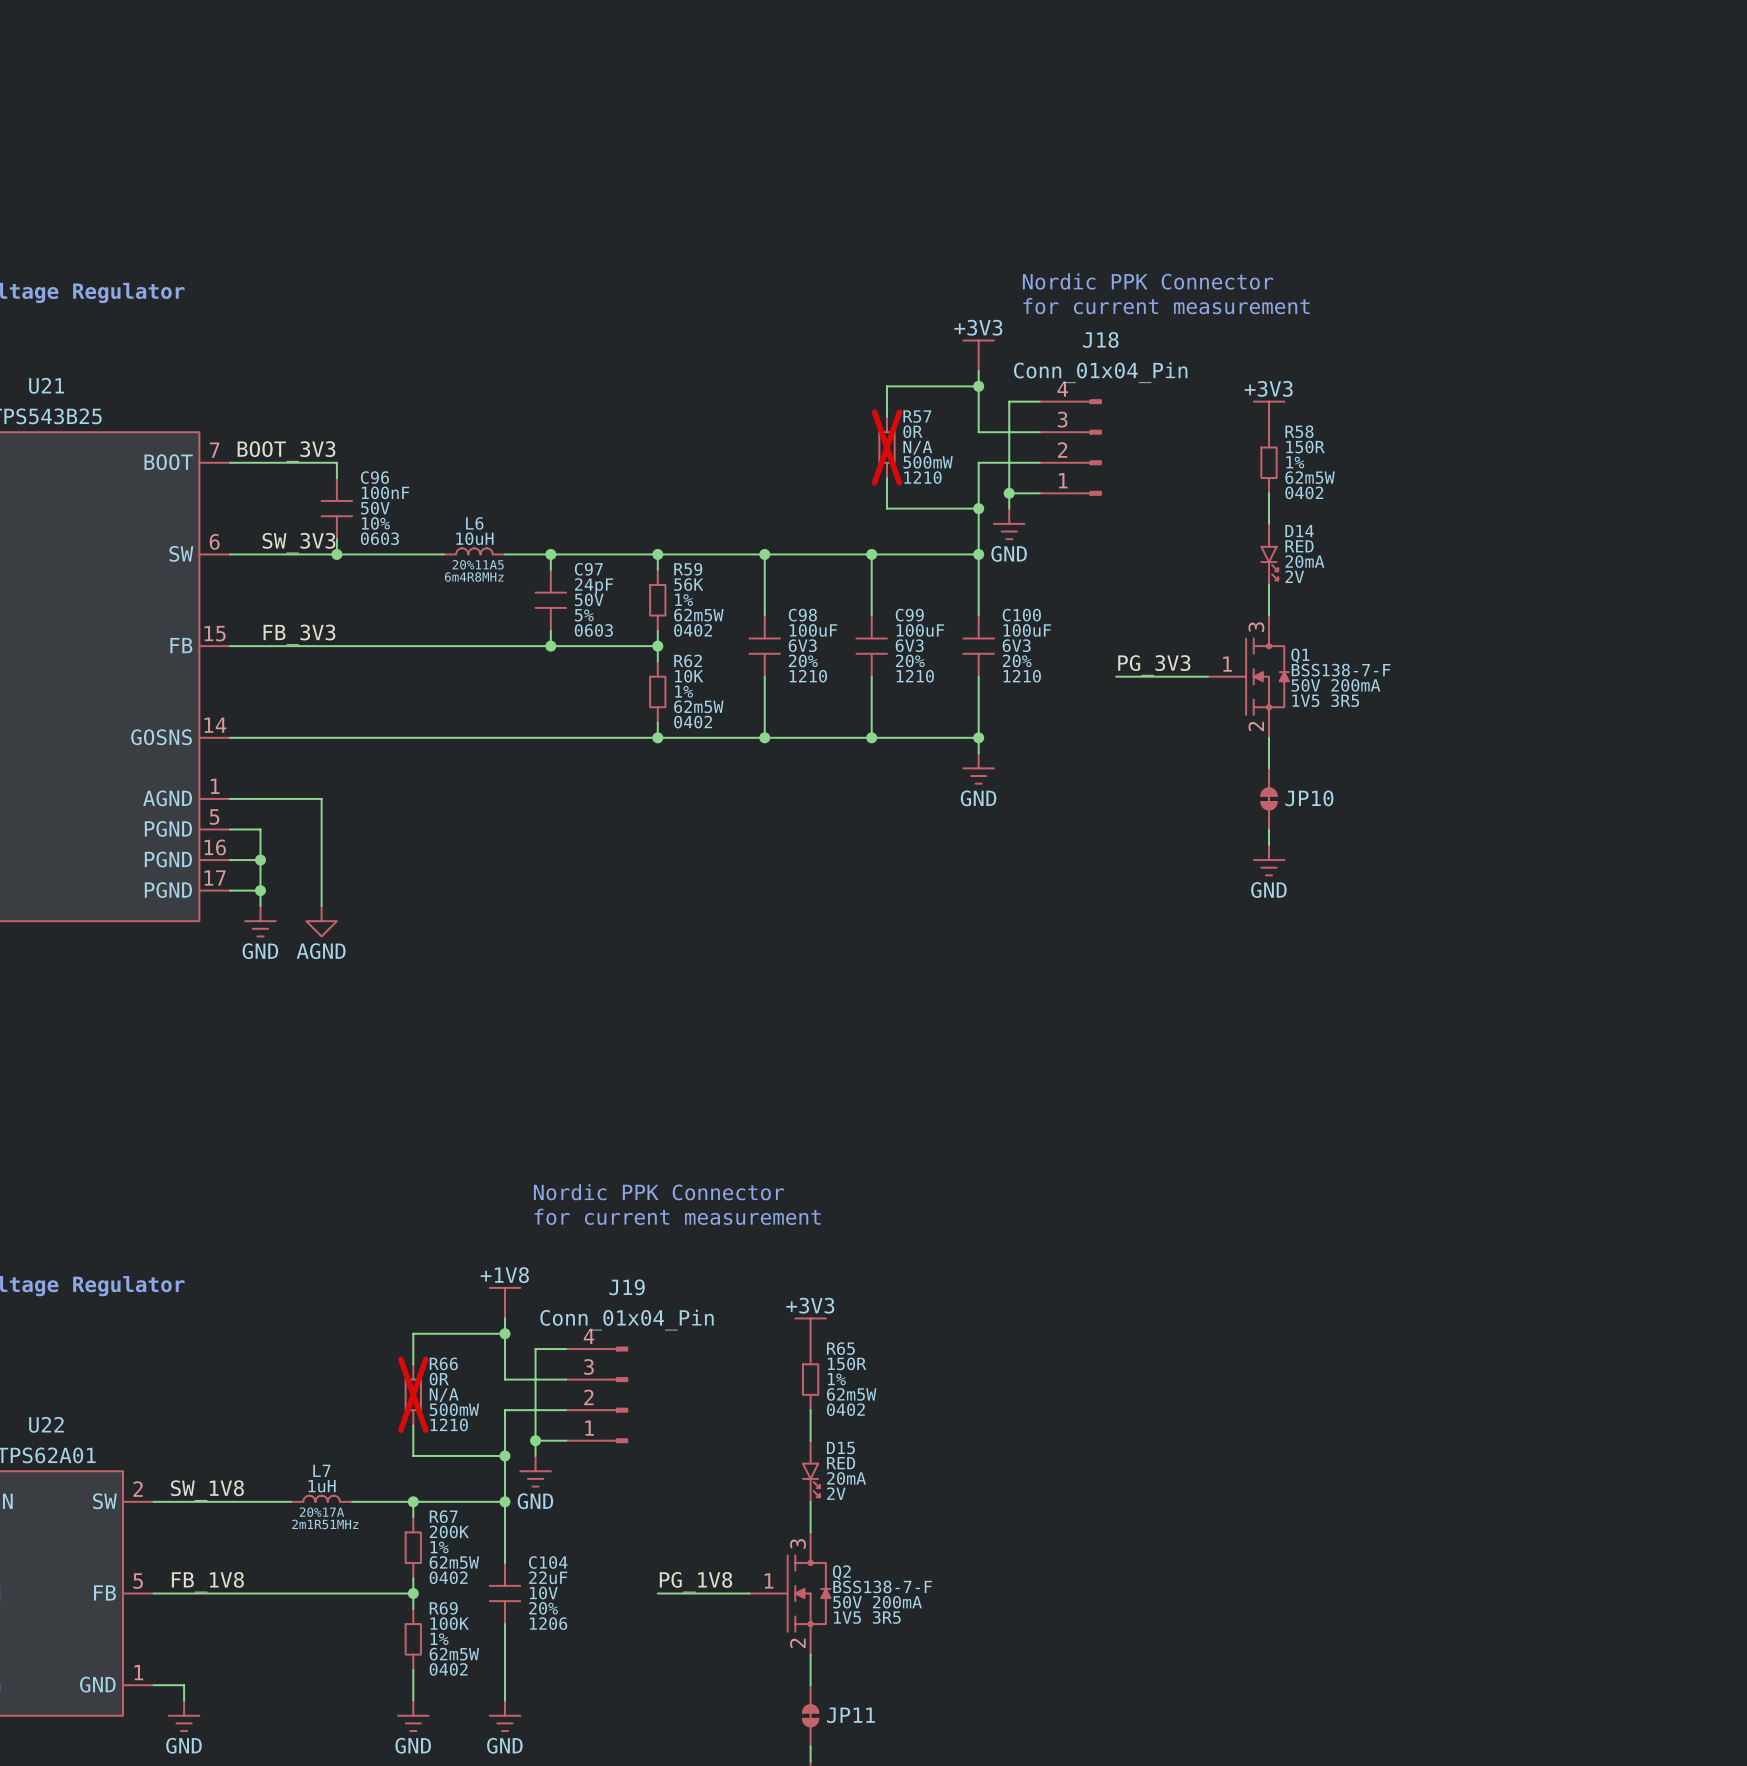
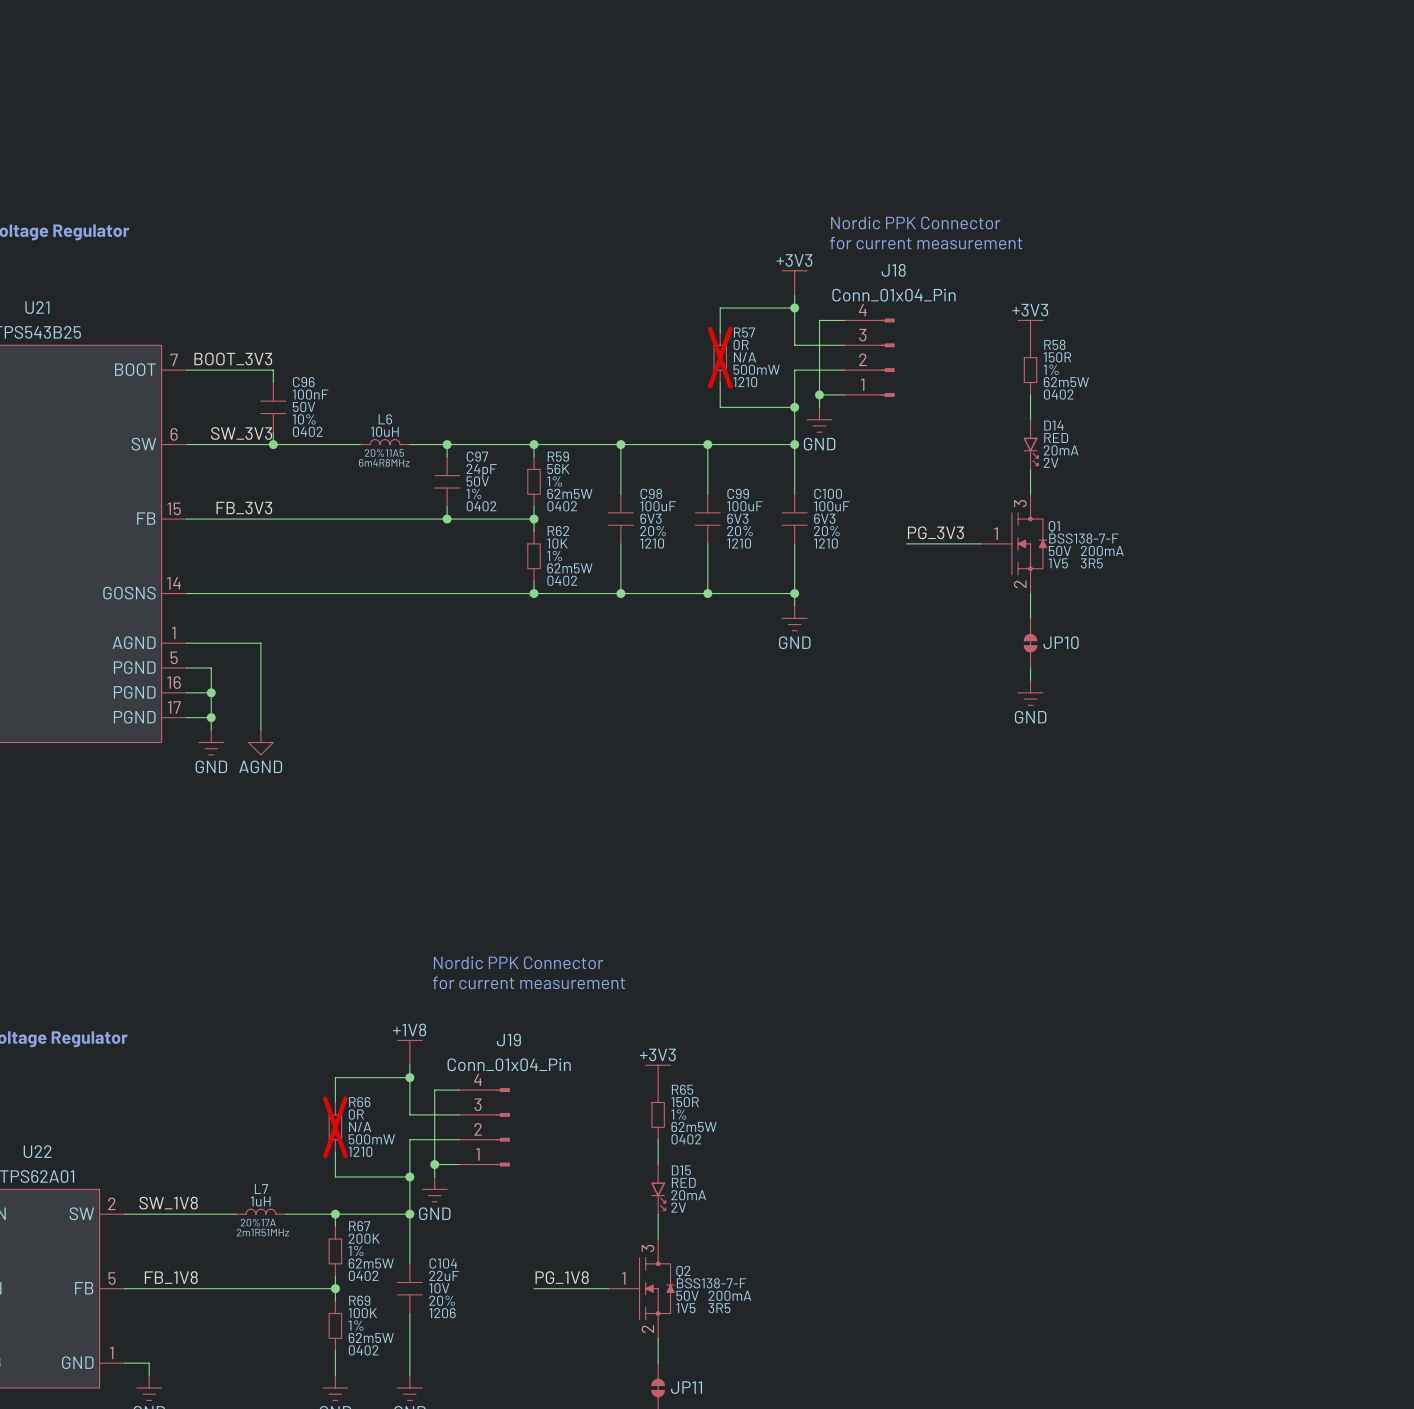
C96 text: 0603 (379, 538) -> 0402 (307, 431)
C97 text: 5% (584, 615) -> 1% (473, 493)
C97 text: 0603 (593, 630) -> 0402 (481, 506)

